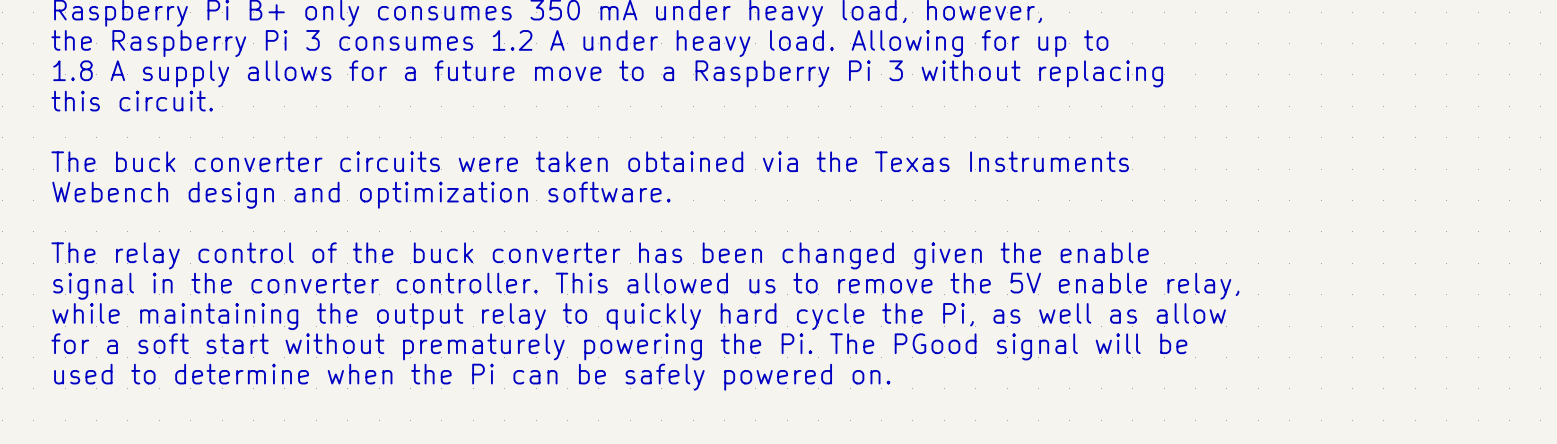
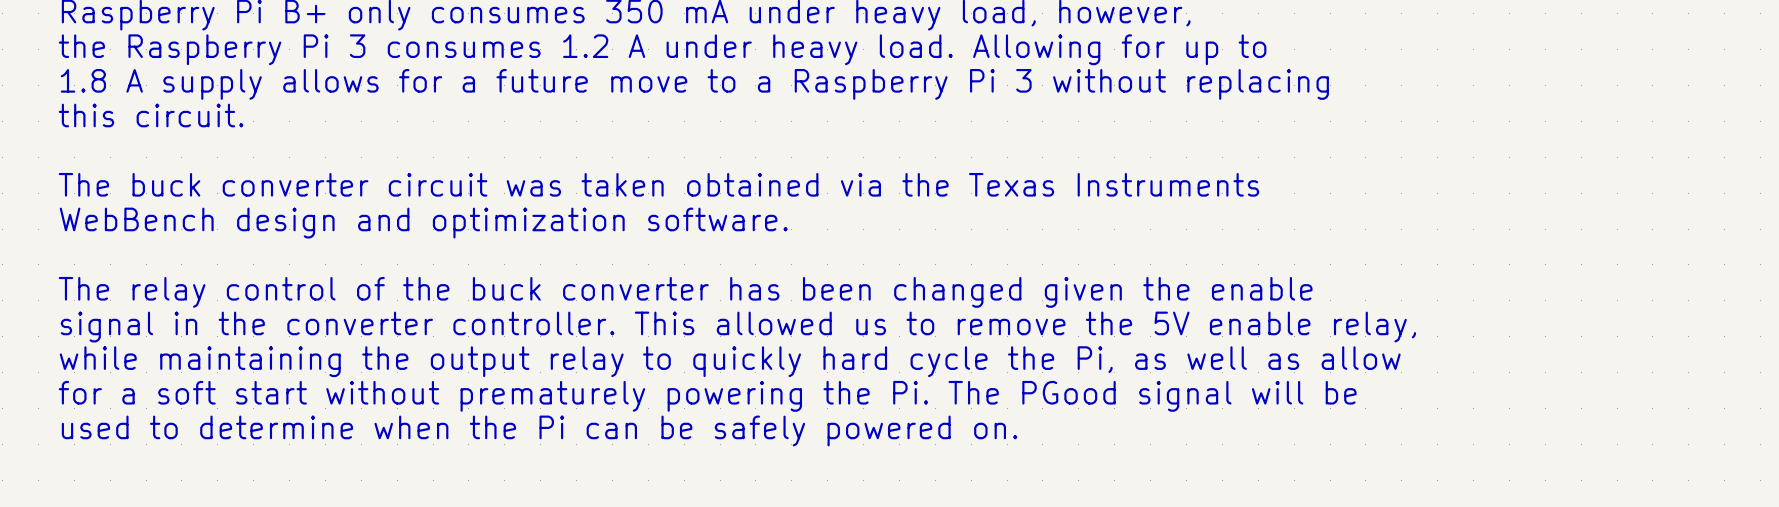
text: The buck converter circuits were taken obtained via the Texas Instruments (590, 161) -> The buck converter circuit was taken obtained via the Texas Instruments (658, 184)
text: Webench design and optimization software. (361, 195) -> WebBench design and optimization software. (423, 223)

